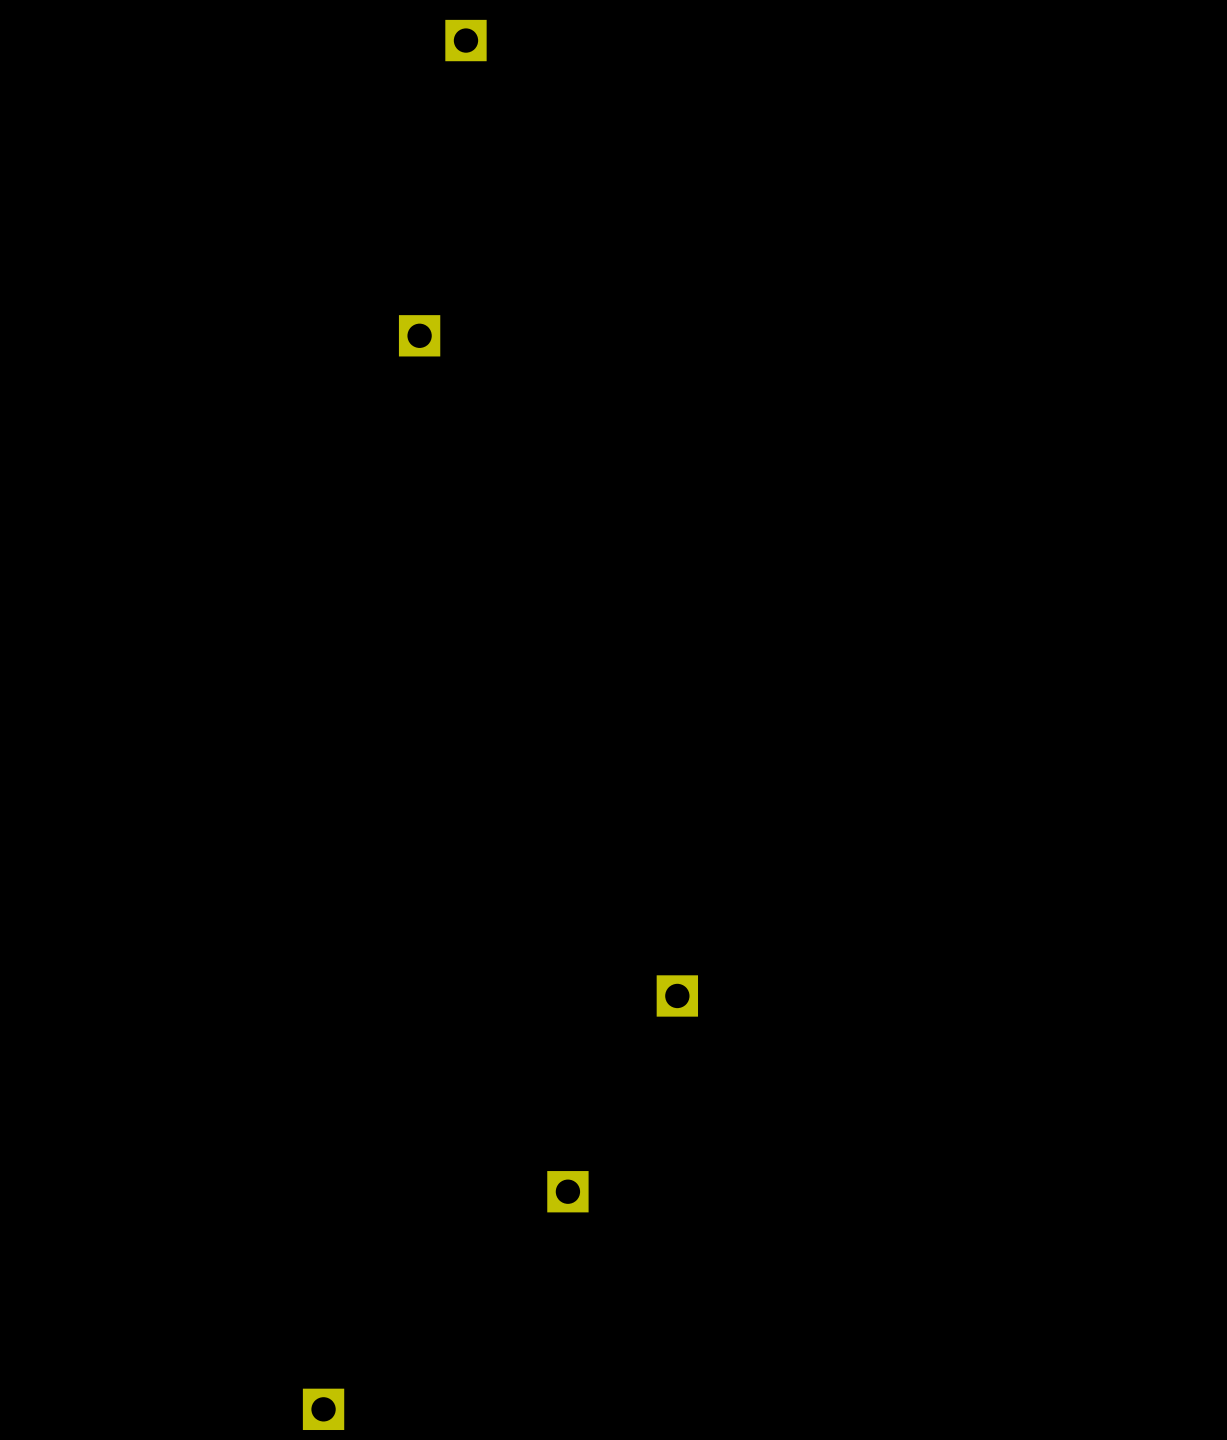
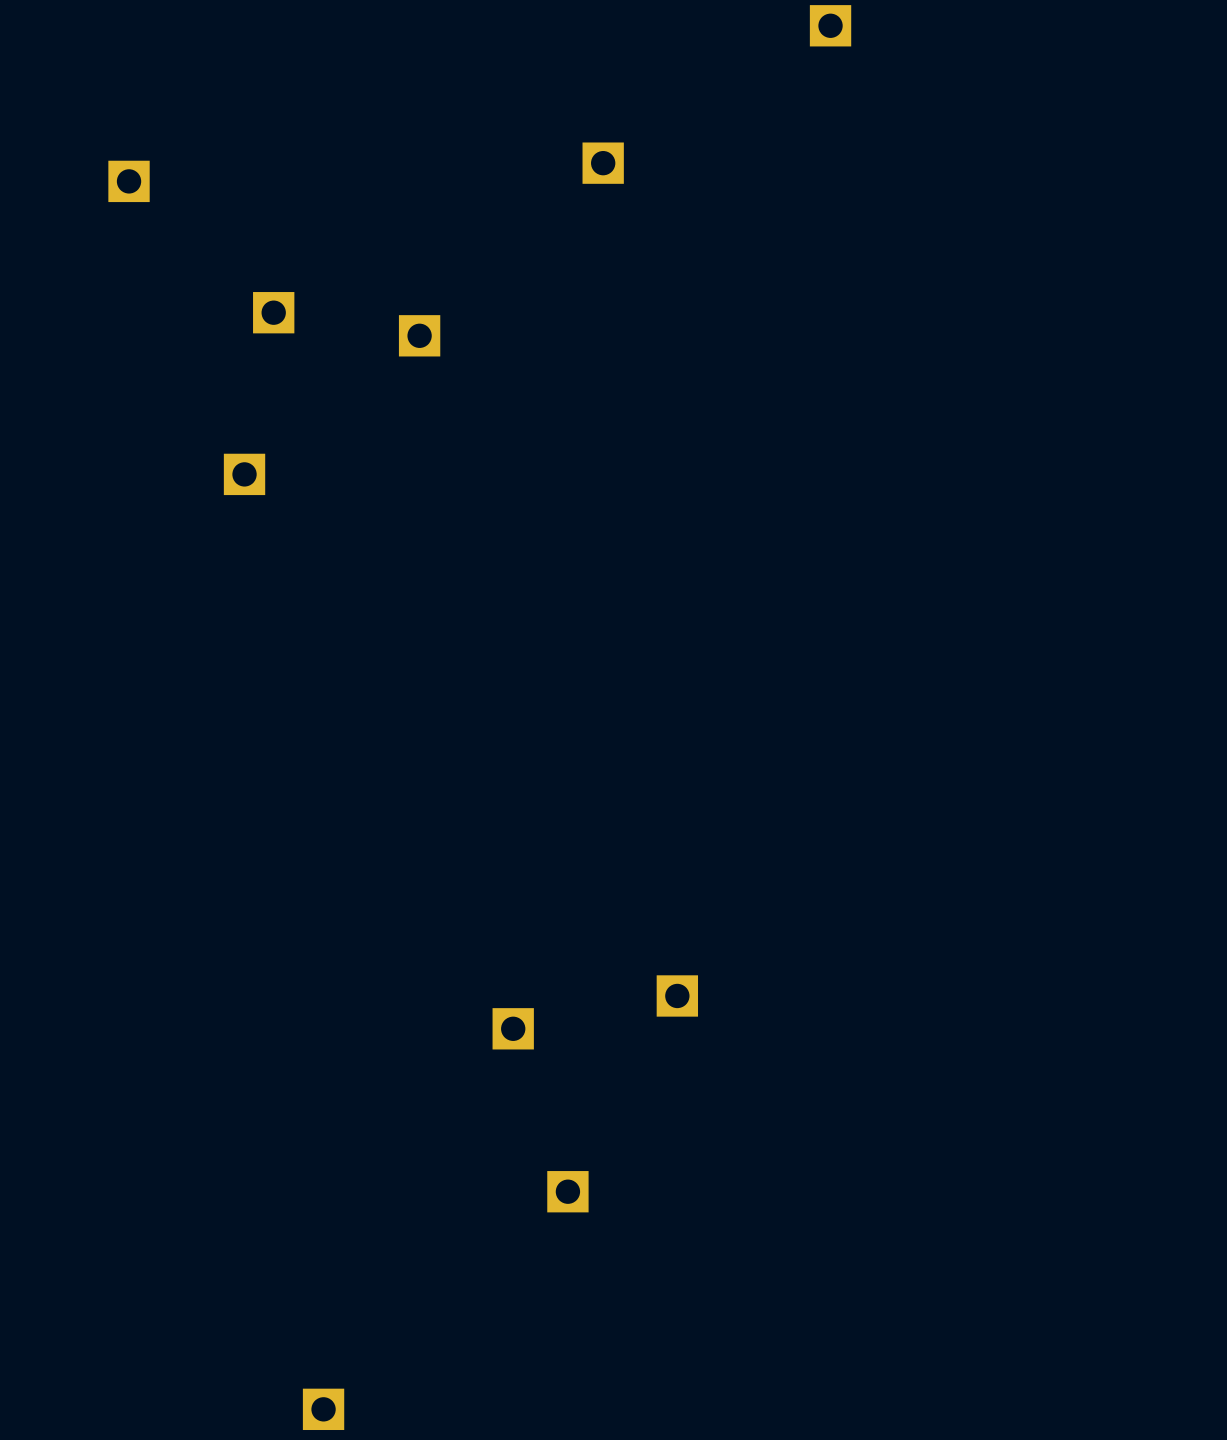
part: none -> (830, 25)
part: (465, 40) -> none
part: none -> (603, 163)
part: none -> (129, 181)
part: none -> (273, 312)
part: none -> (244, 474)
part: none -> (513, 1028)

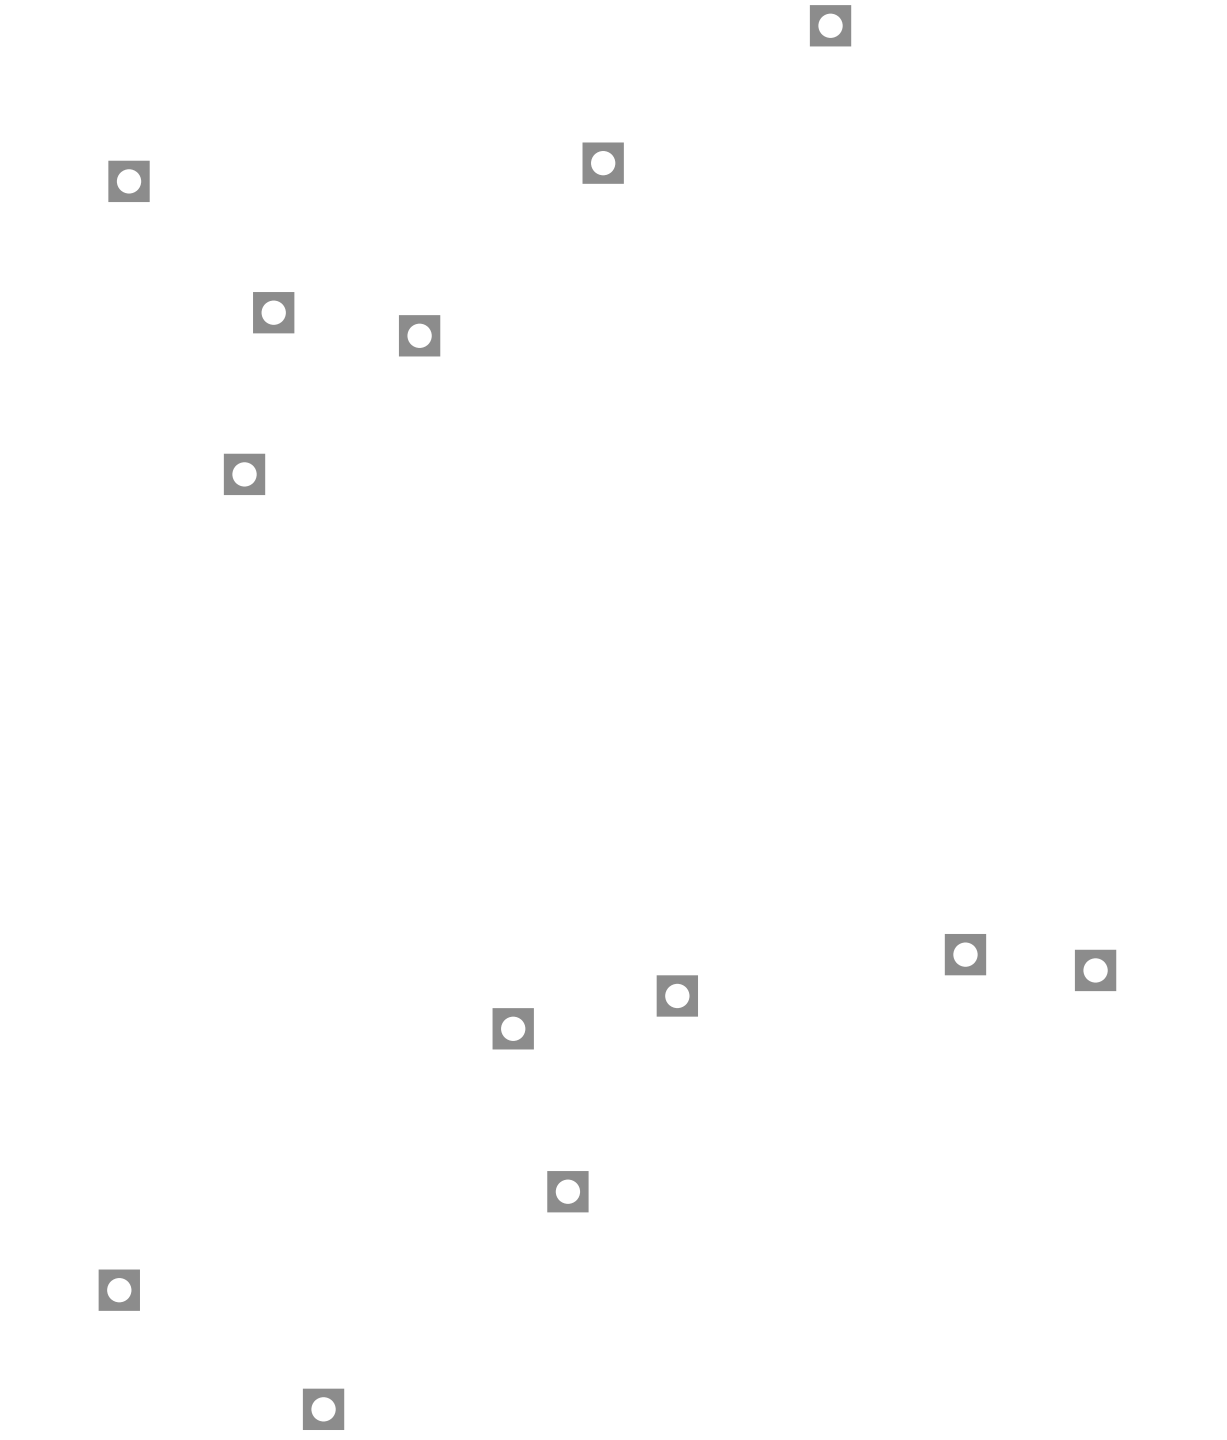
part: none -> (965, 954)
part: none -> (1095, 970)
part: none -> (119, 1290)

